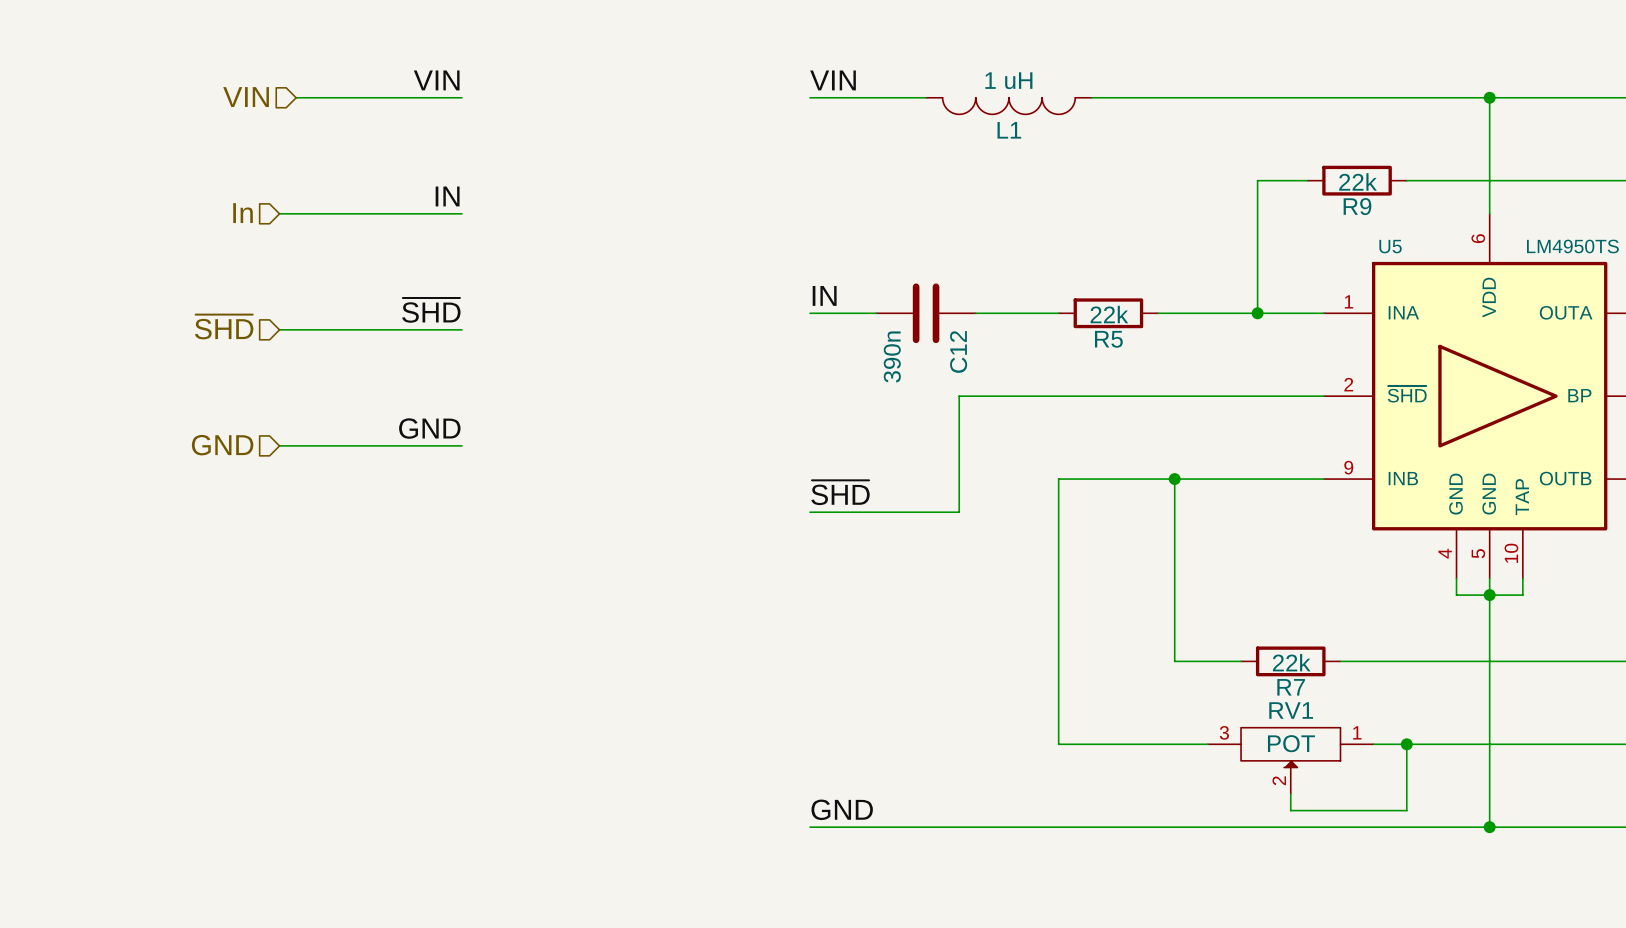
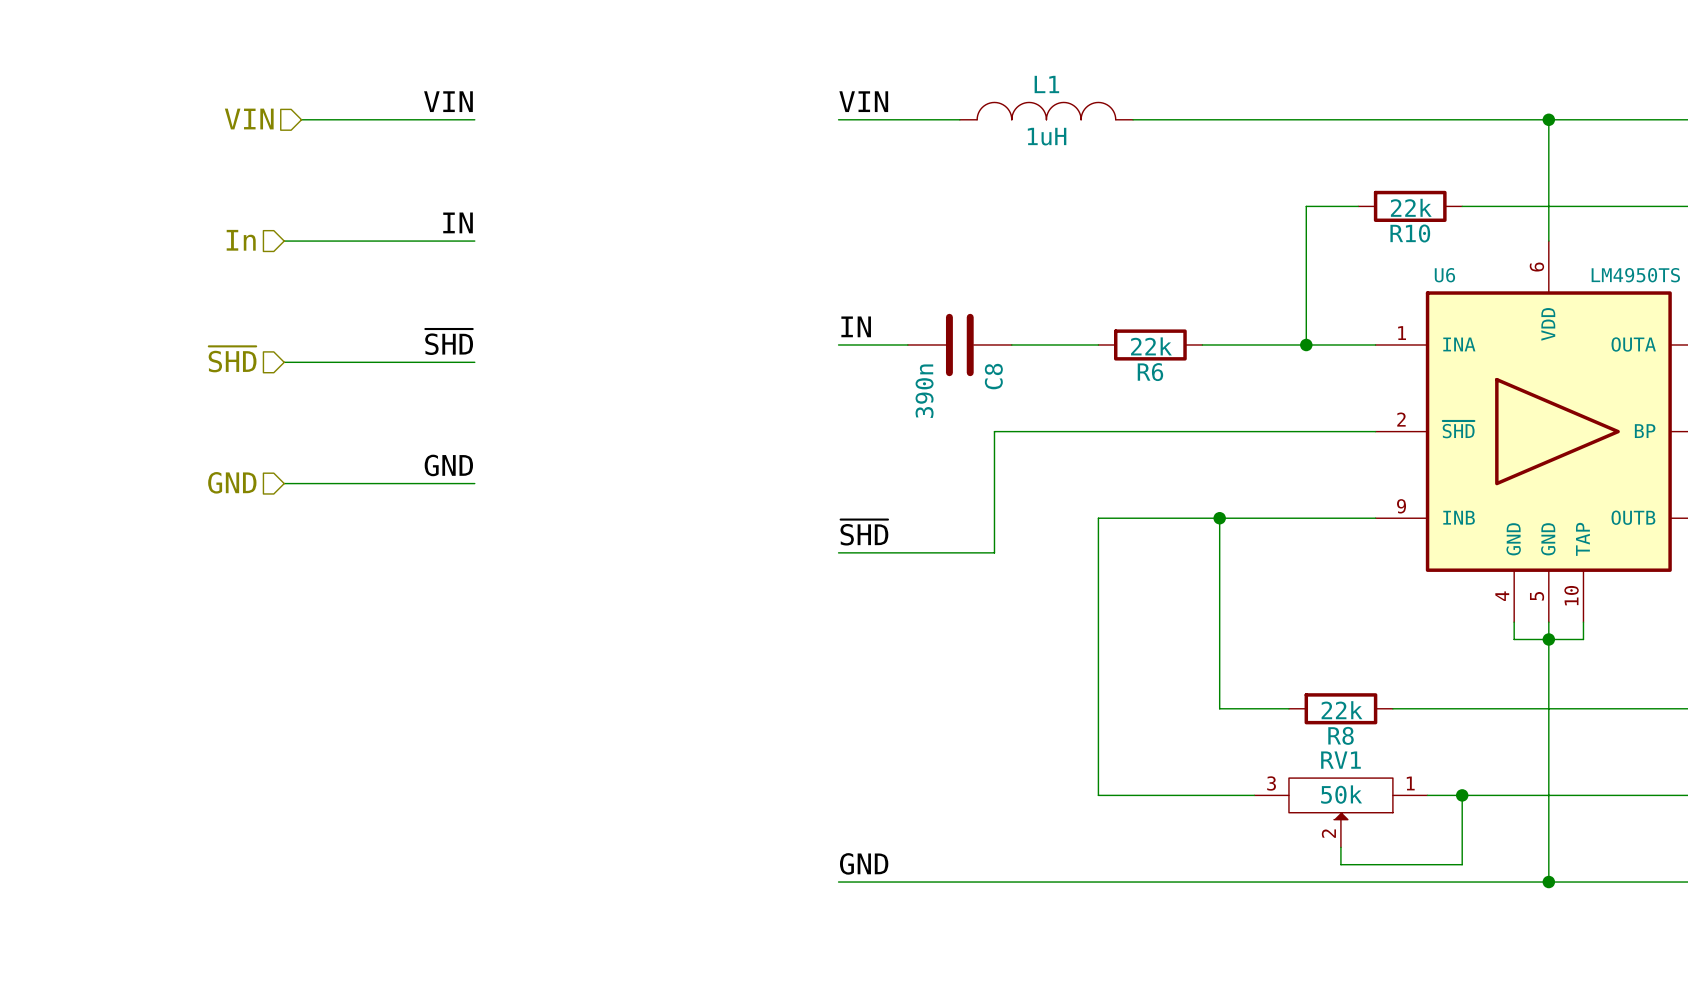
L1 value: 1 uH (1008, 80) -> 1uH (1047, 136)
L1 rotation: 0° (1008, 106) -> 180° (1046, 111)
R9 name: R9 (1357, 206) -> R10 (1410, 233)
U5 name: U5 (1390, 246) -> U6 (1444, 275)
R5 name: R5 (1108, 339) -> R6 (1150, 372)
C12 name: C12 (958, 351) -> C8 (993, 376)
R7 name: R7 (1291, 687) -> R8 (1341, 735)
RV1 value: POT (1291, 743) -> 50k (1341, 794)

